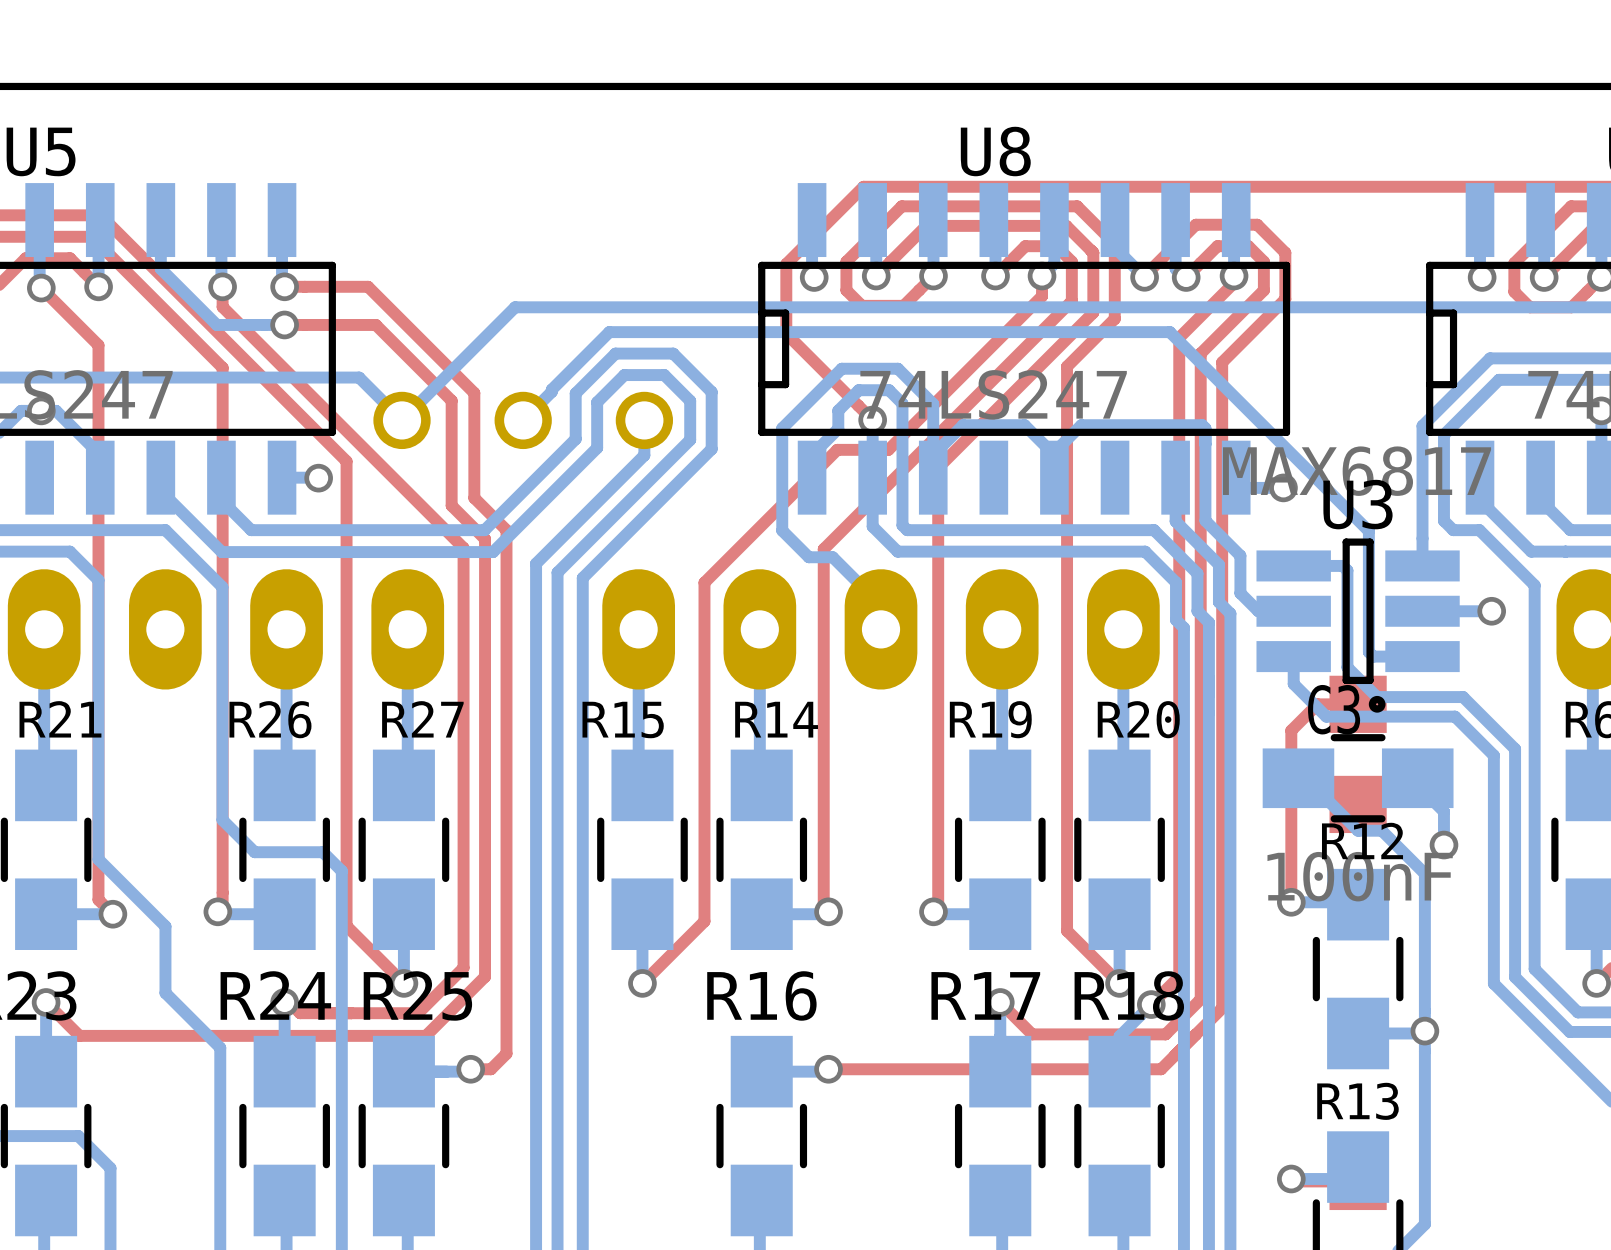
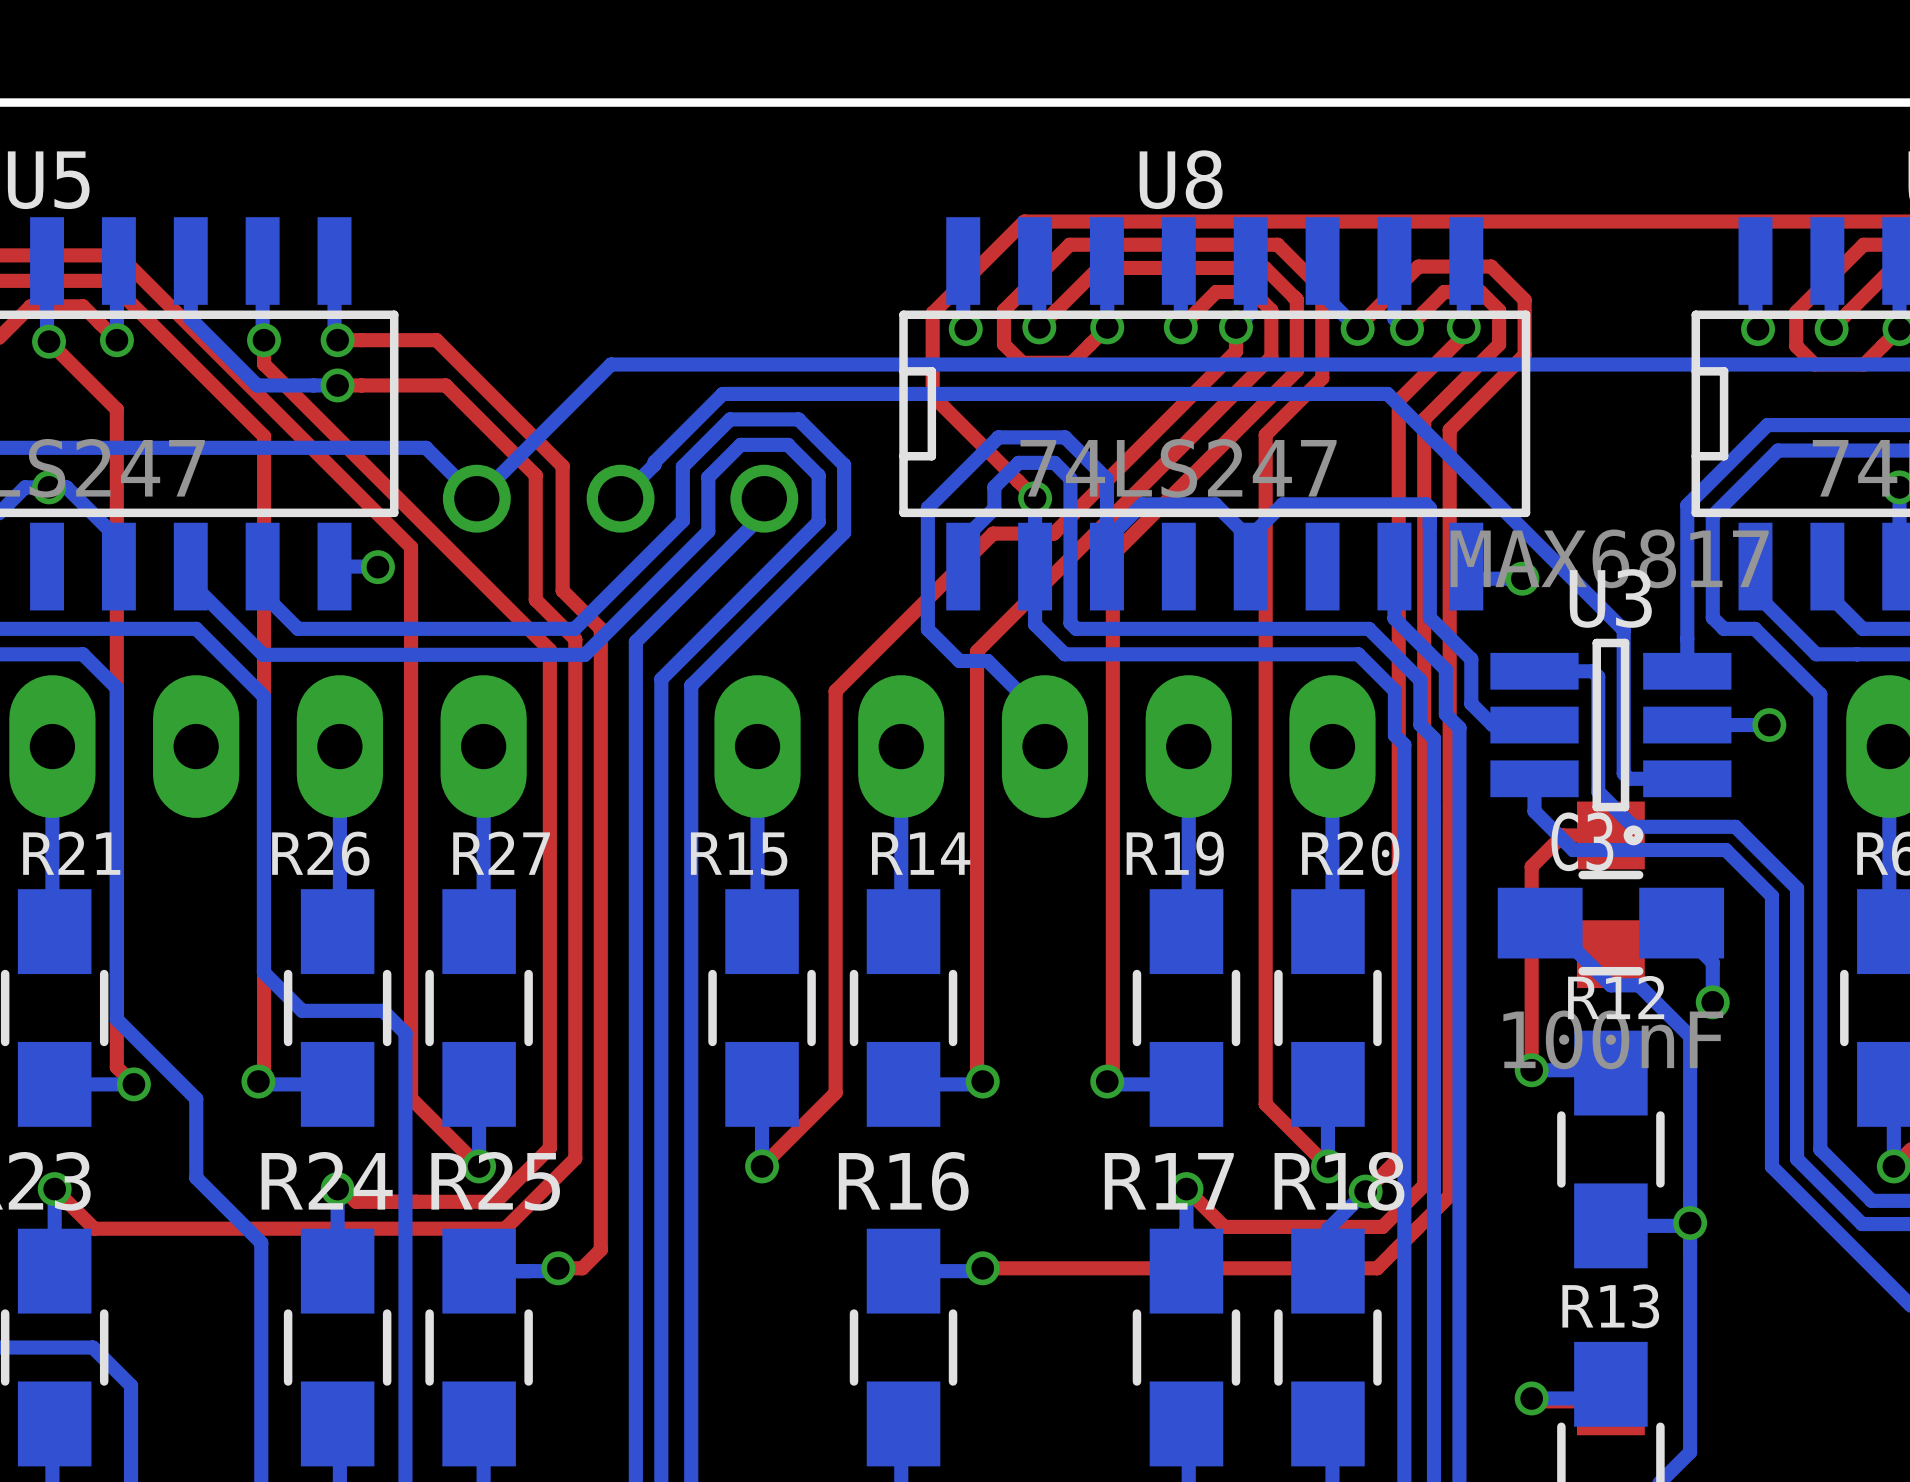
bottom track: (644, 432) (644, 455) (536, 563) -> (764, 513) (635, 641) (635, 668)

